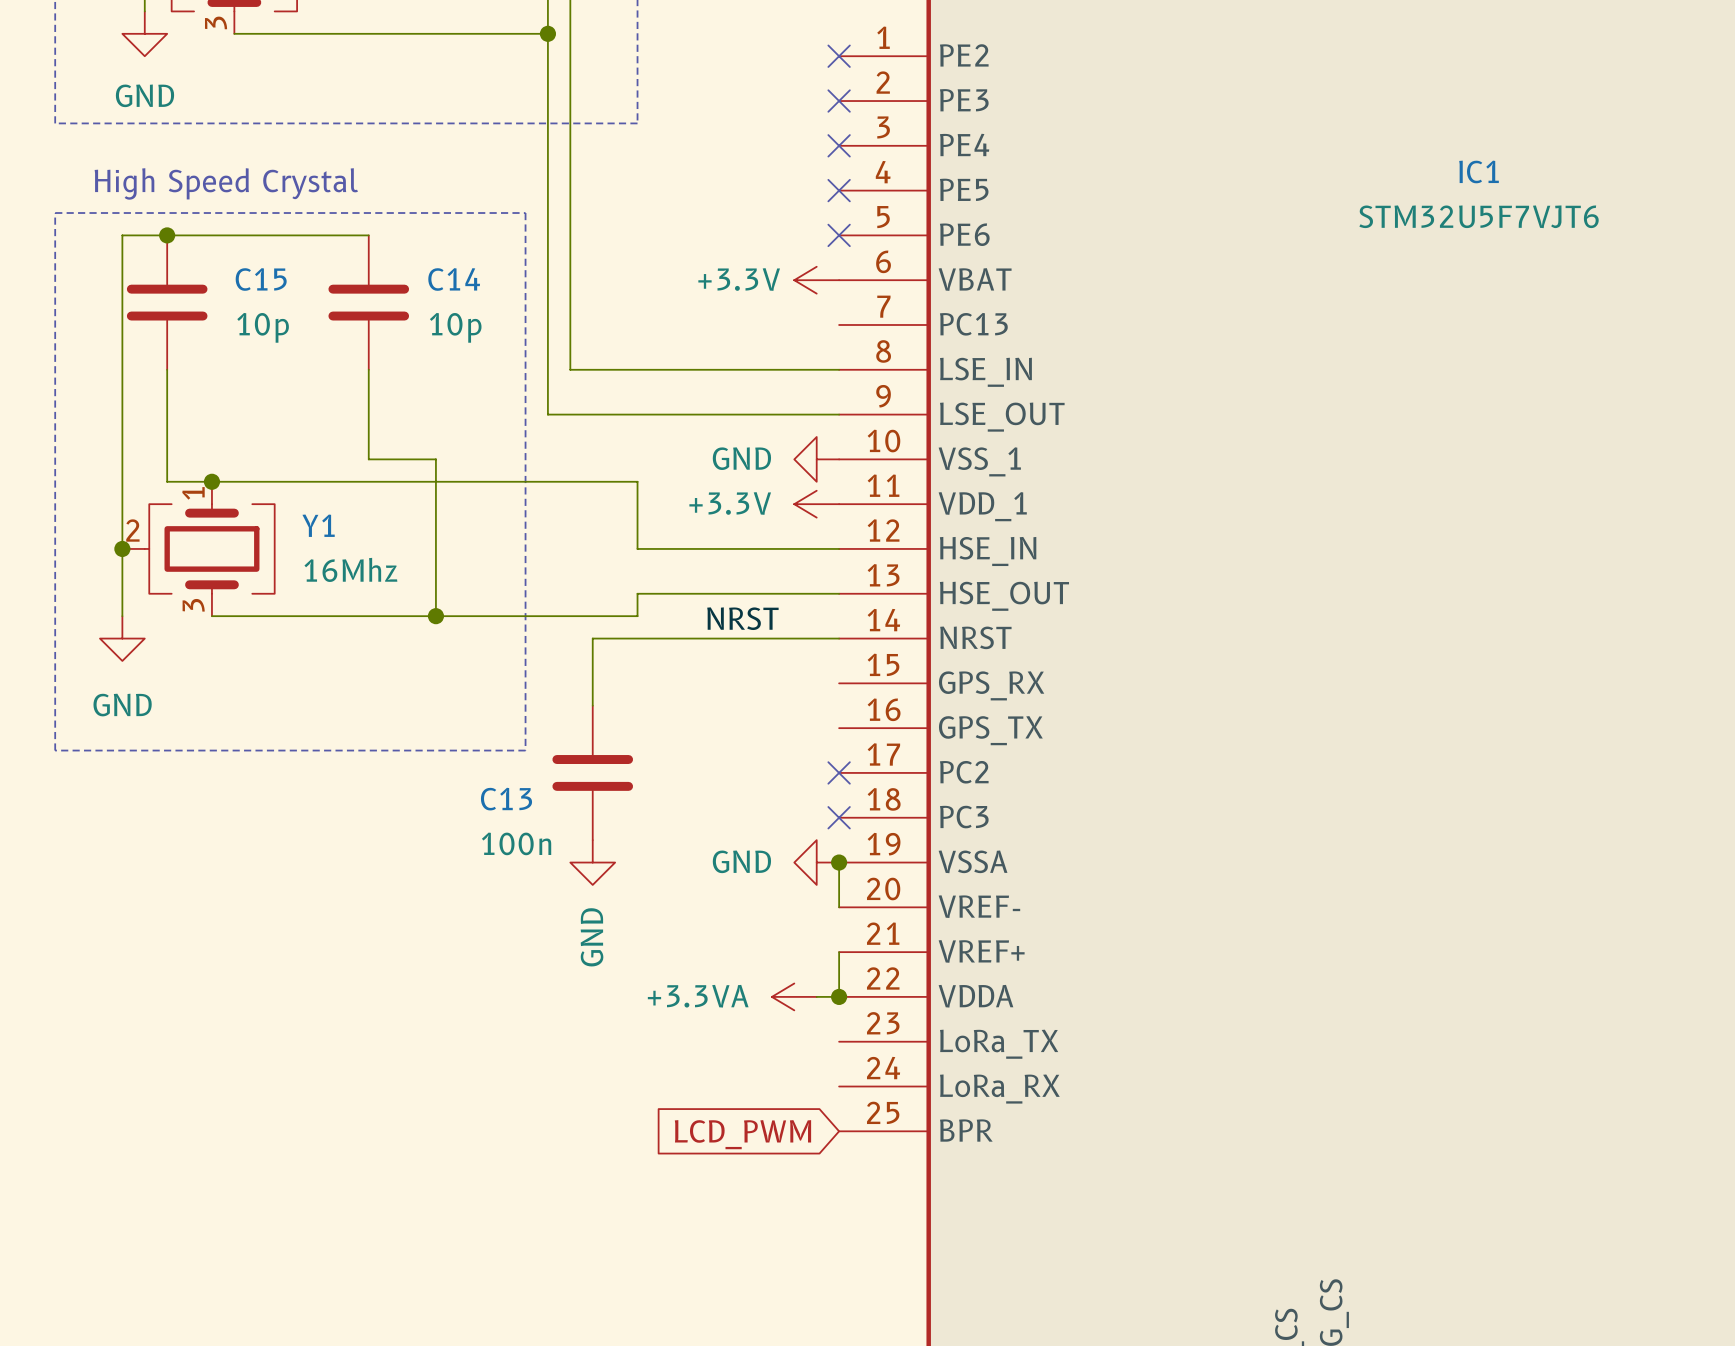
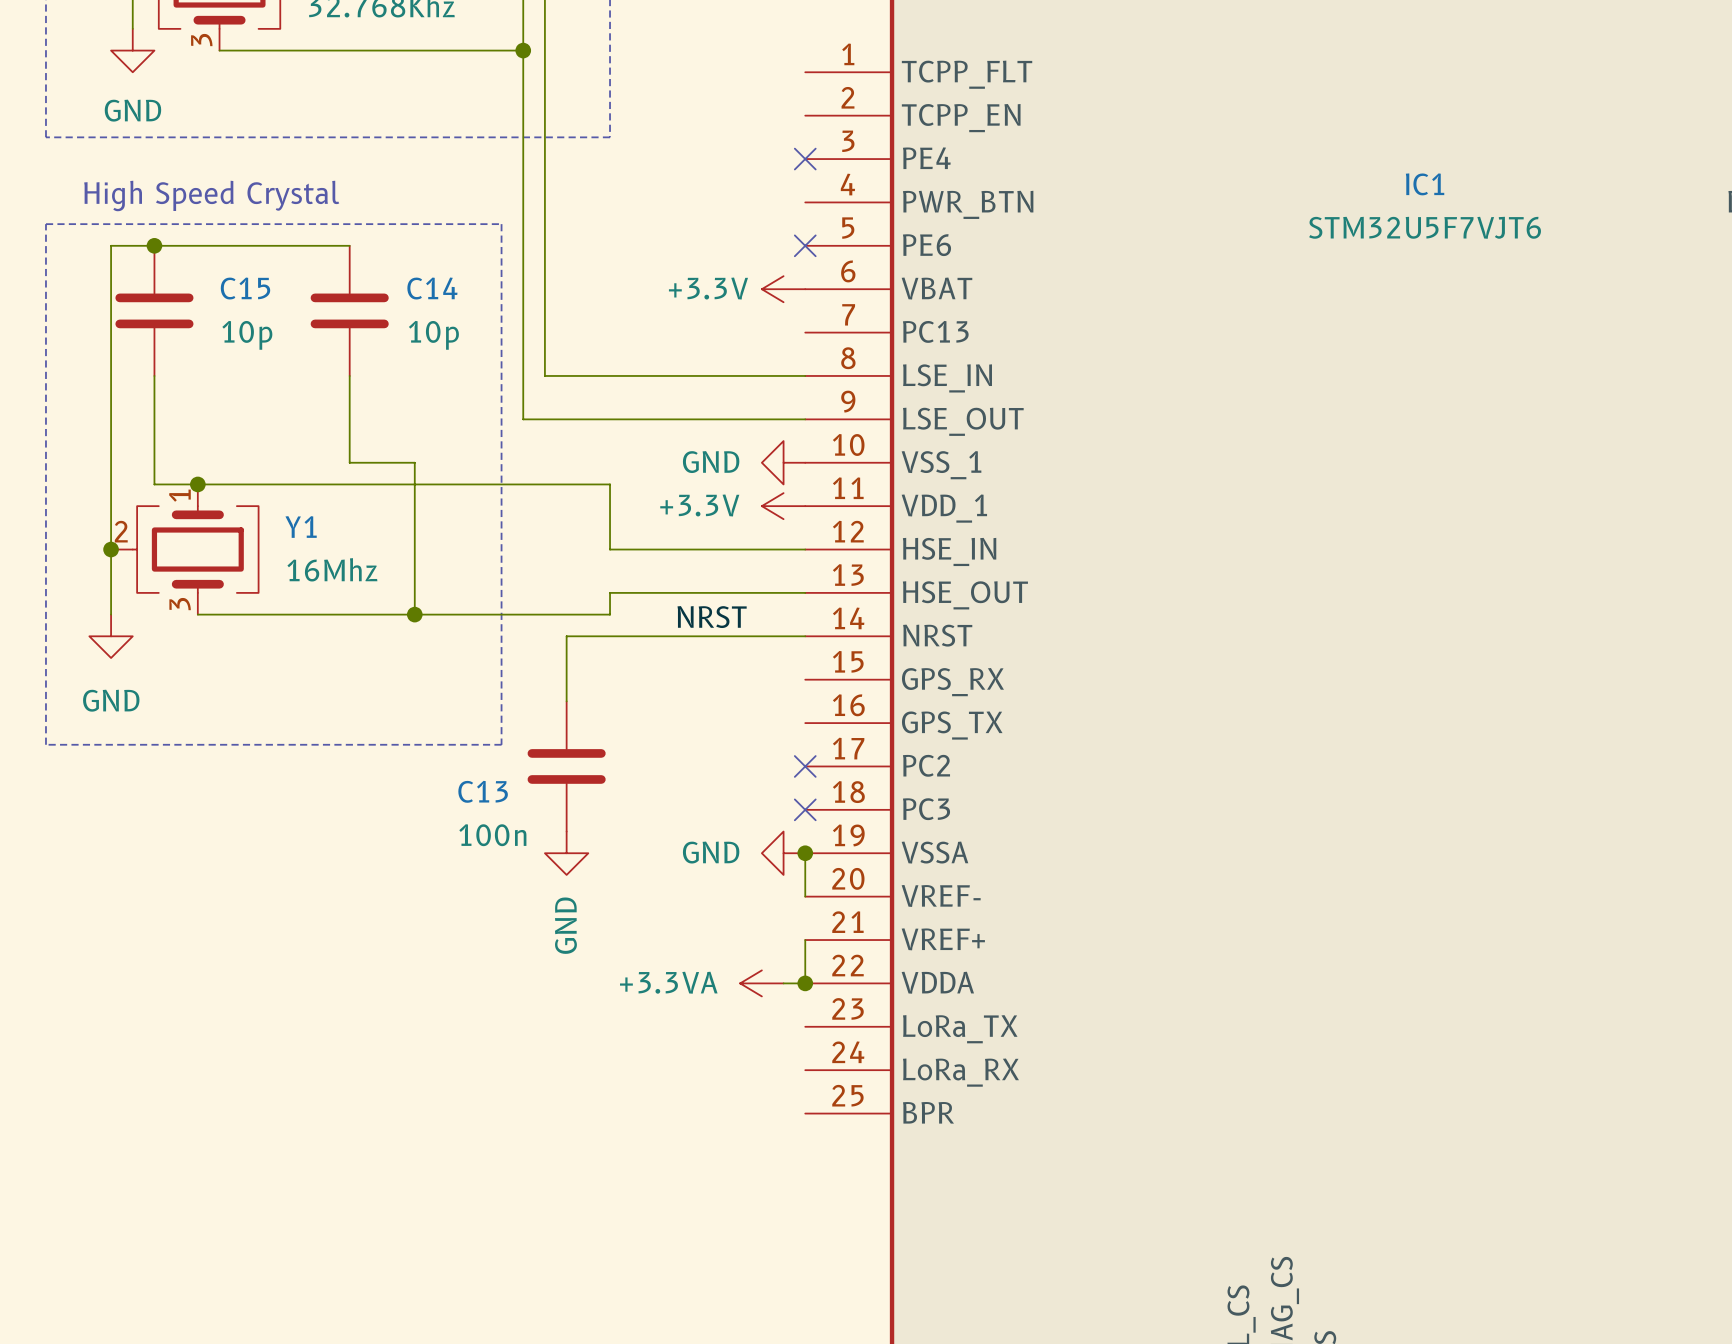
IC1 pin name: PE2 (964, 55) -> TCPP_FLT (967, 74)
no-connect mark: (839, 56) -> none
IC1 pin name: PE3 (964, 100) -> TCPP_EN (961, 118)
no-connect mark: (839, 101) -> none
IC1 pin name: PE5 (964, 189) -> PWR_BTN (968, 204)
no-connect mark: (839, 190) -> none
global label: LCD_PWM (742, 1134) -> none

